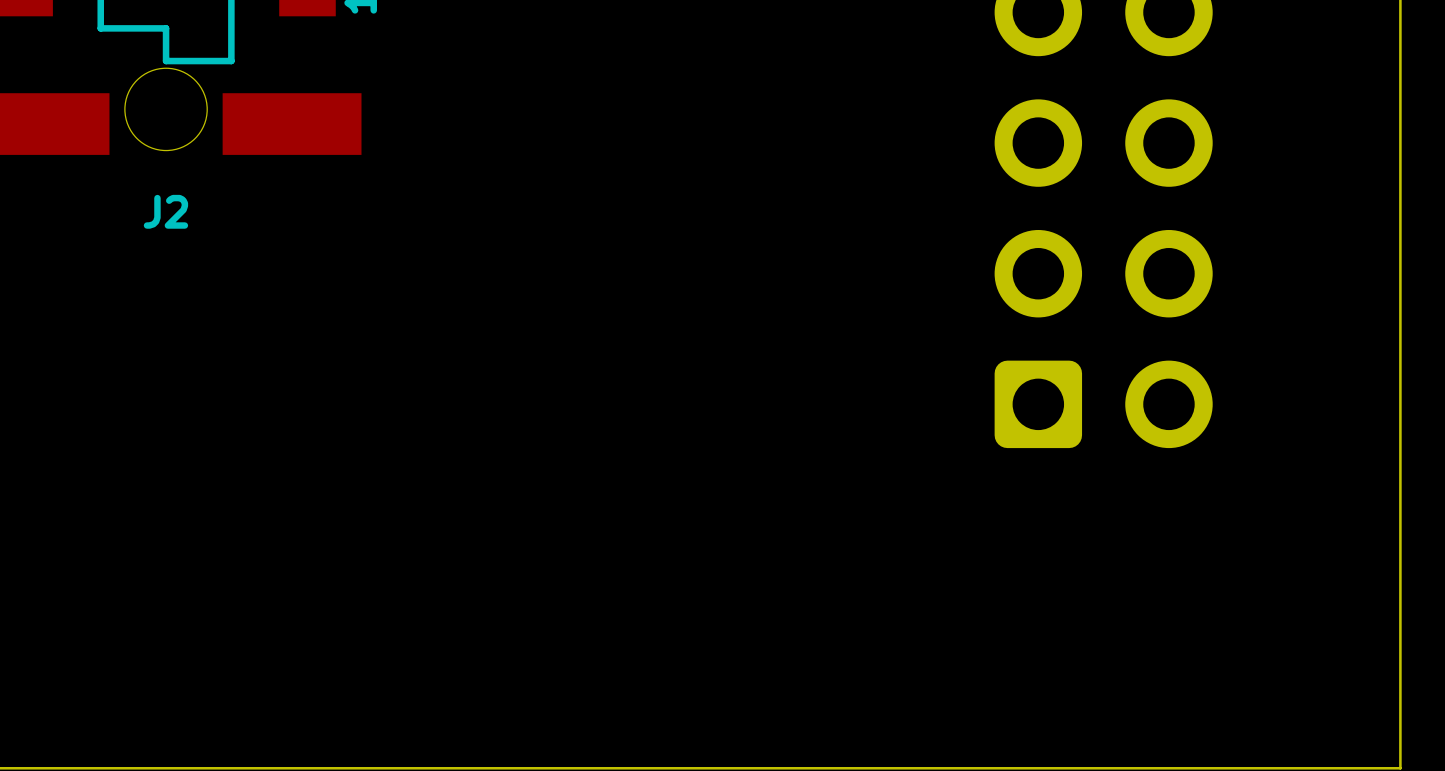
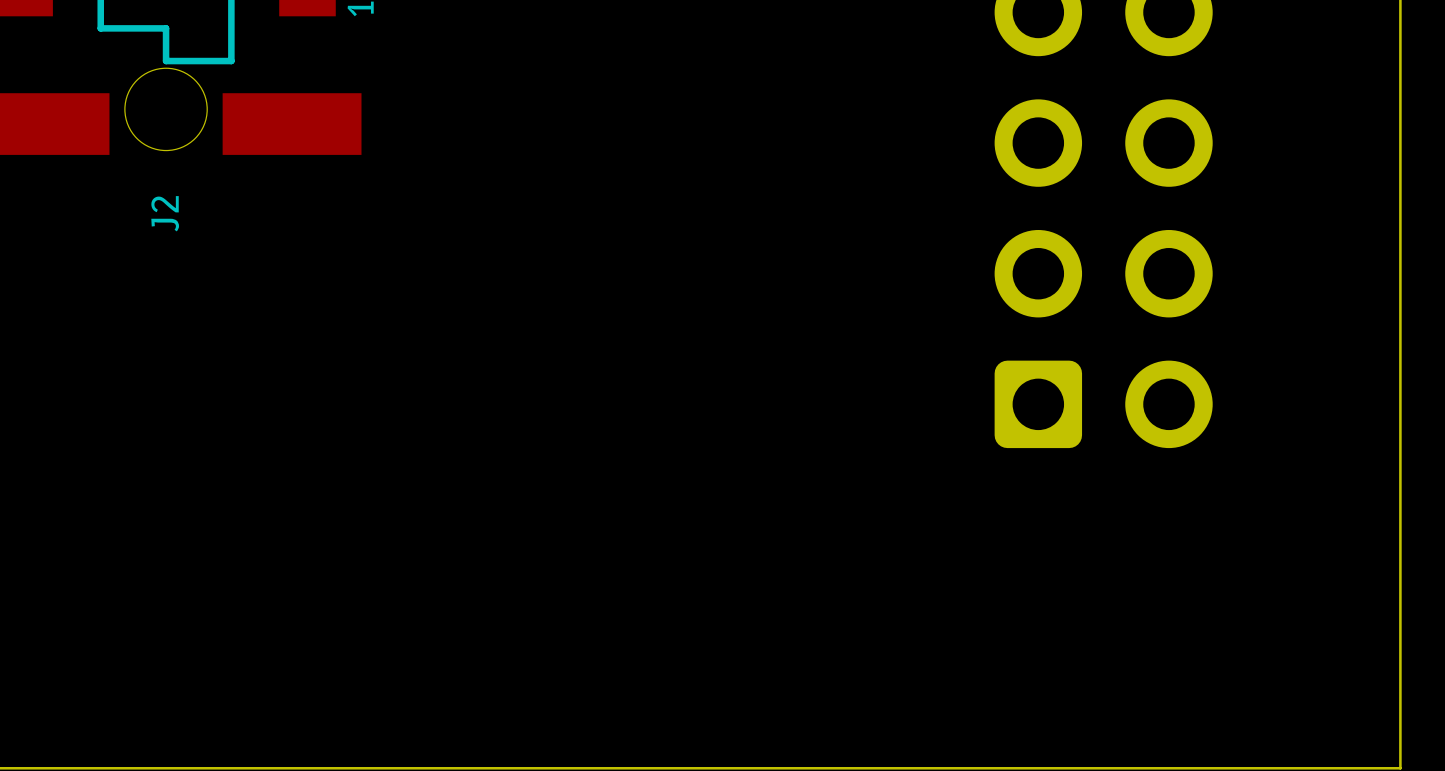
J2 name rotation: 0° (165, 211) -> 90° counterclockwise (165, 213)

